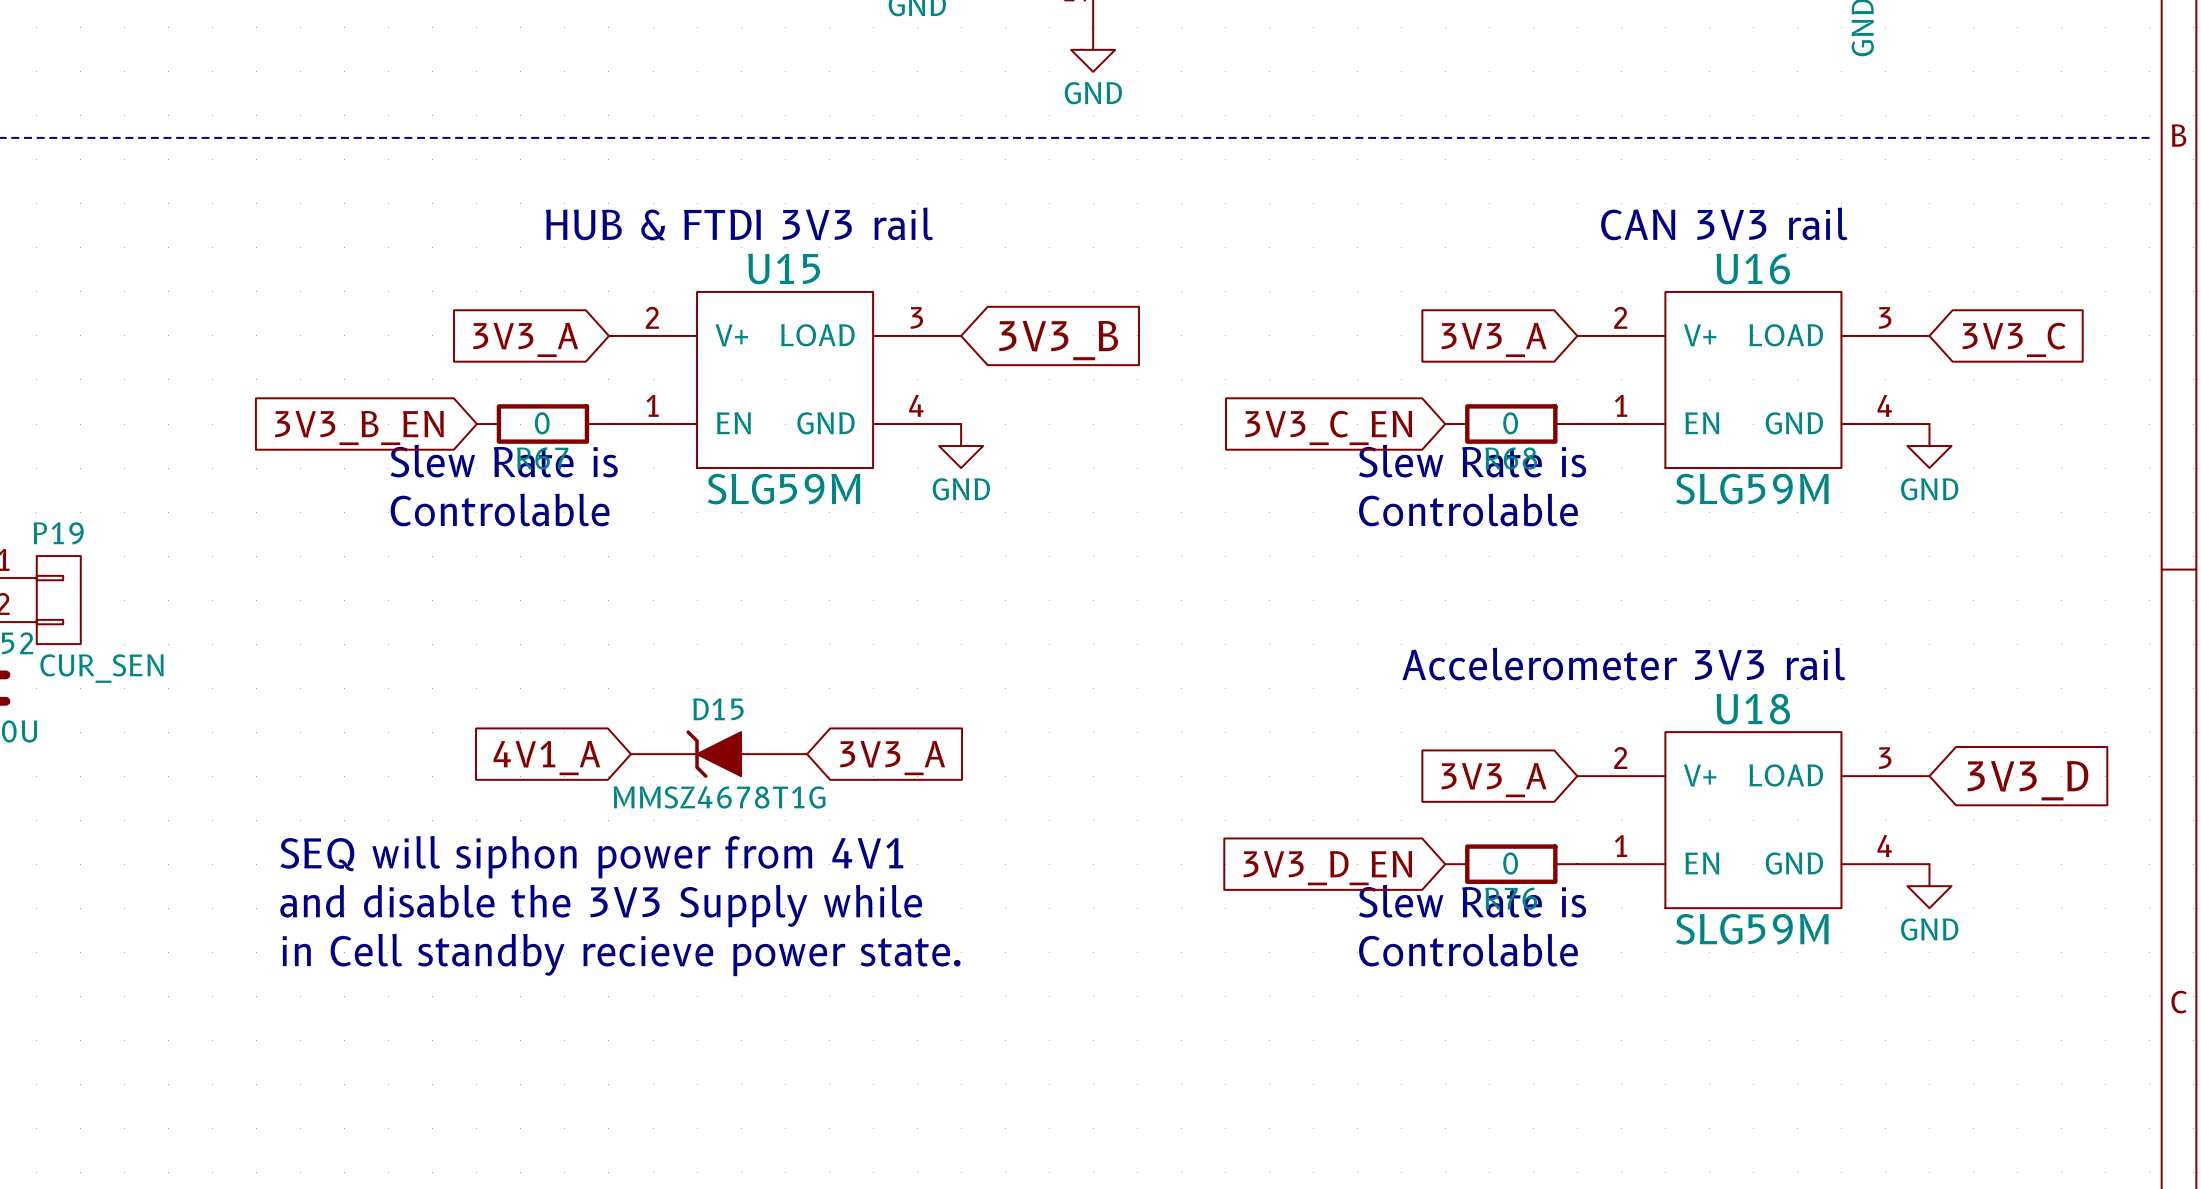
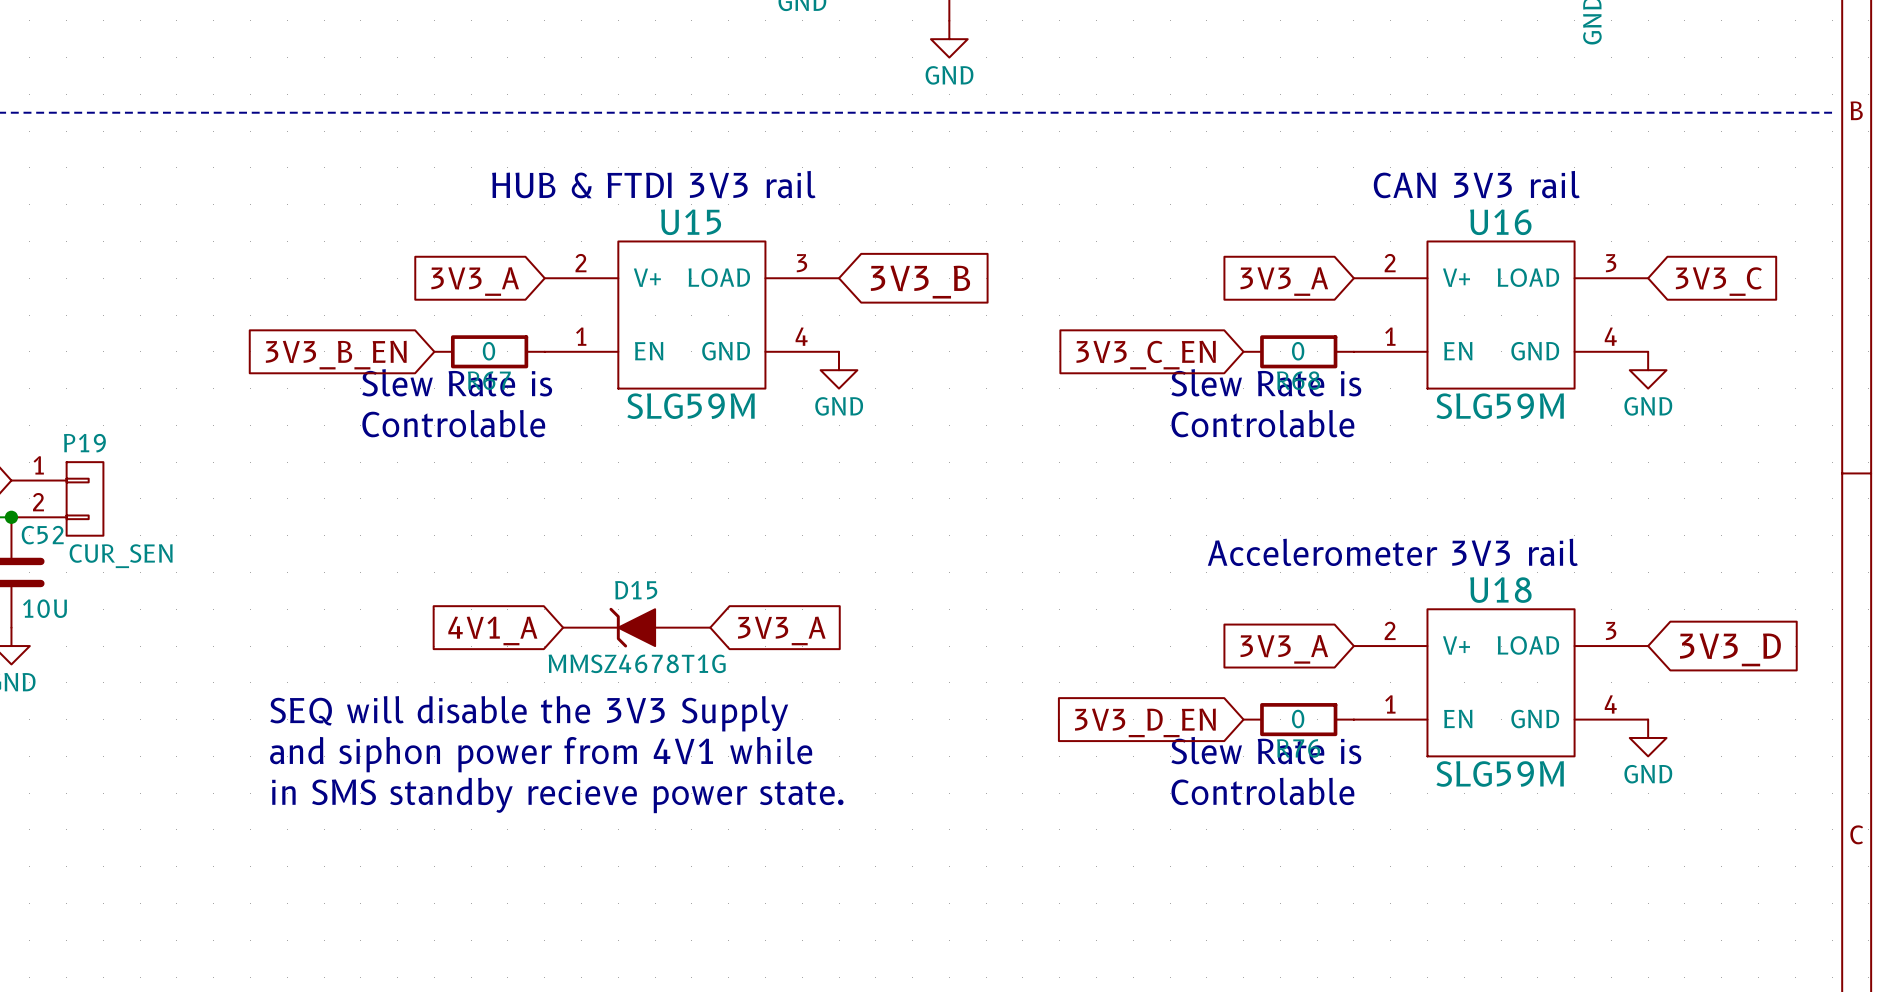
text: SEQ will siphon power from 4V1 (591, 857) -> SEQ will disable the 3V3 Supply (529, 713)
text: and disable the 3V3 Supply while (601, 906) -> and siphon power from 4V1 while (541, 754)
text: in Cell standby recieve power state. (621, 954) -> in SMS standby recieve power state. (557, 795)

